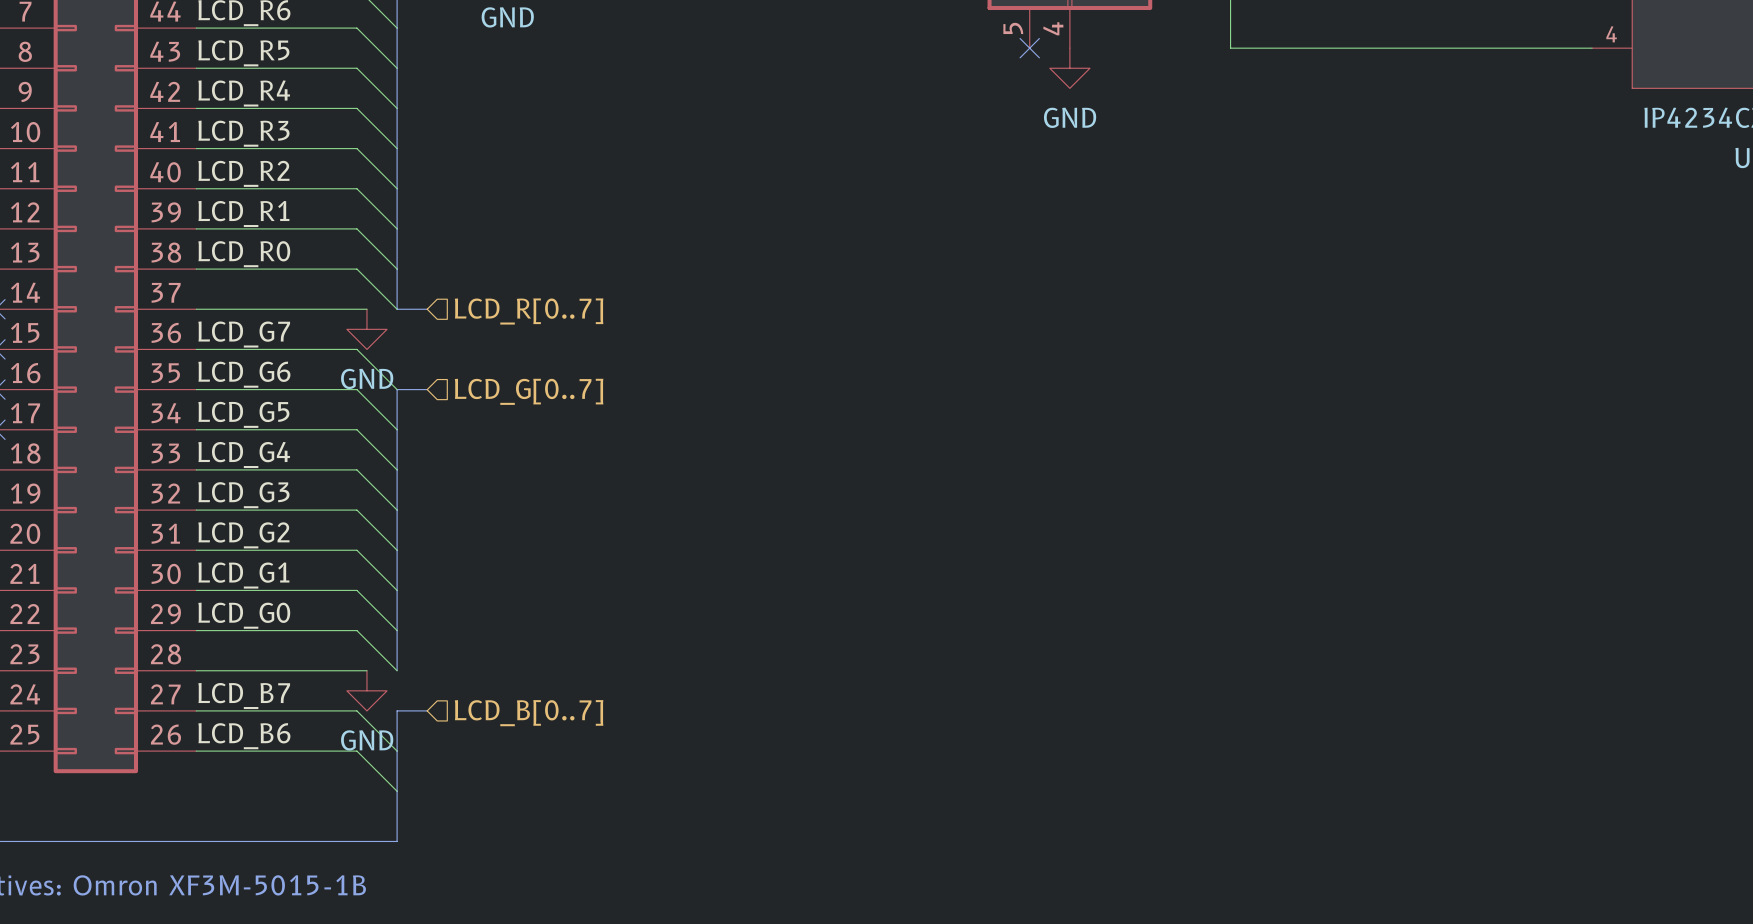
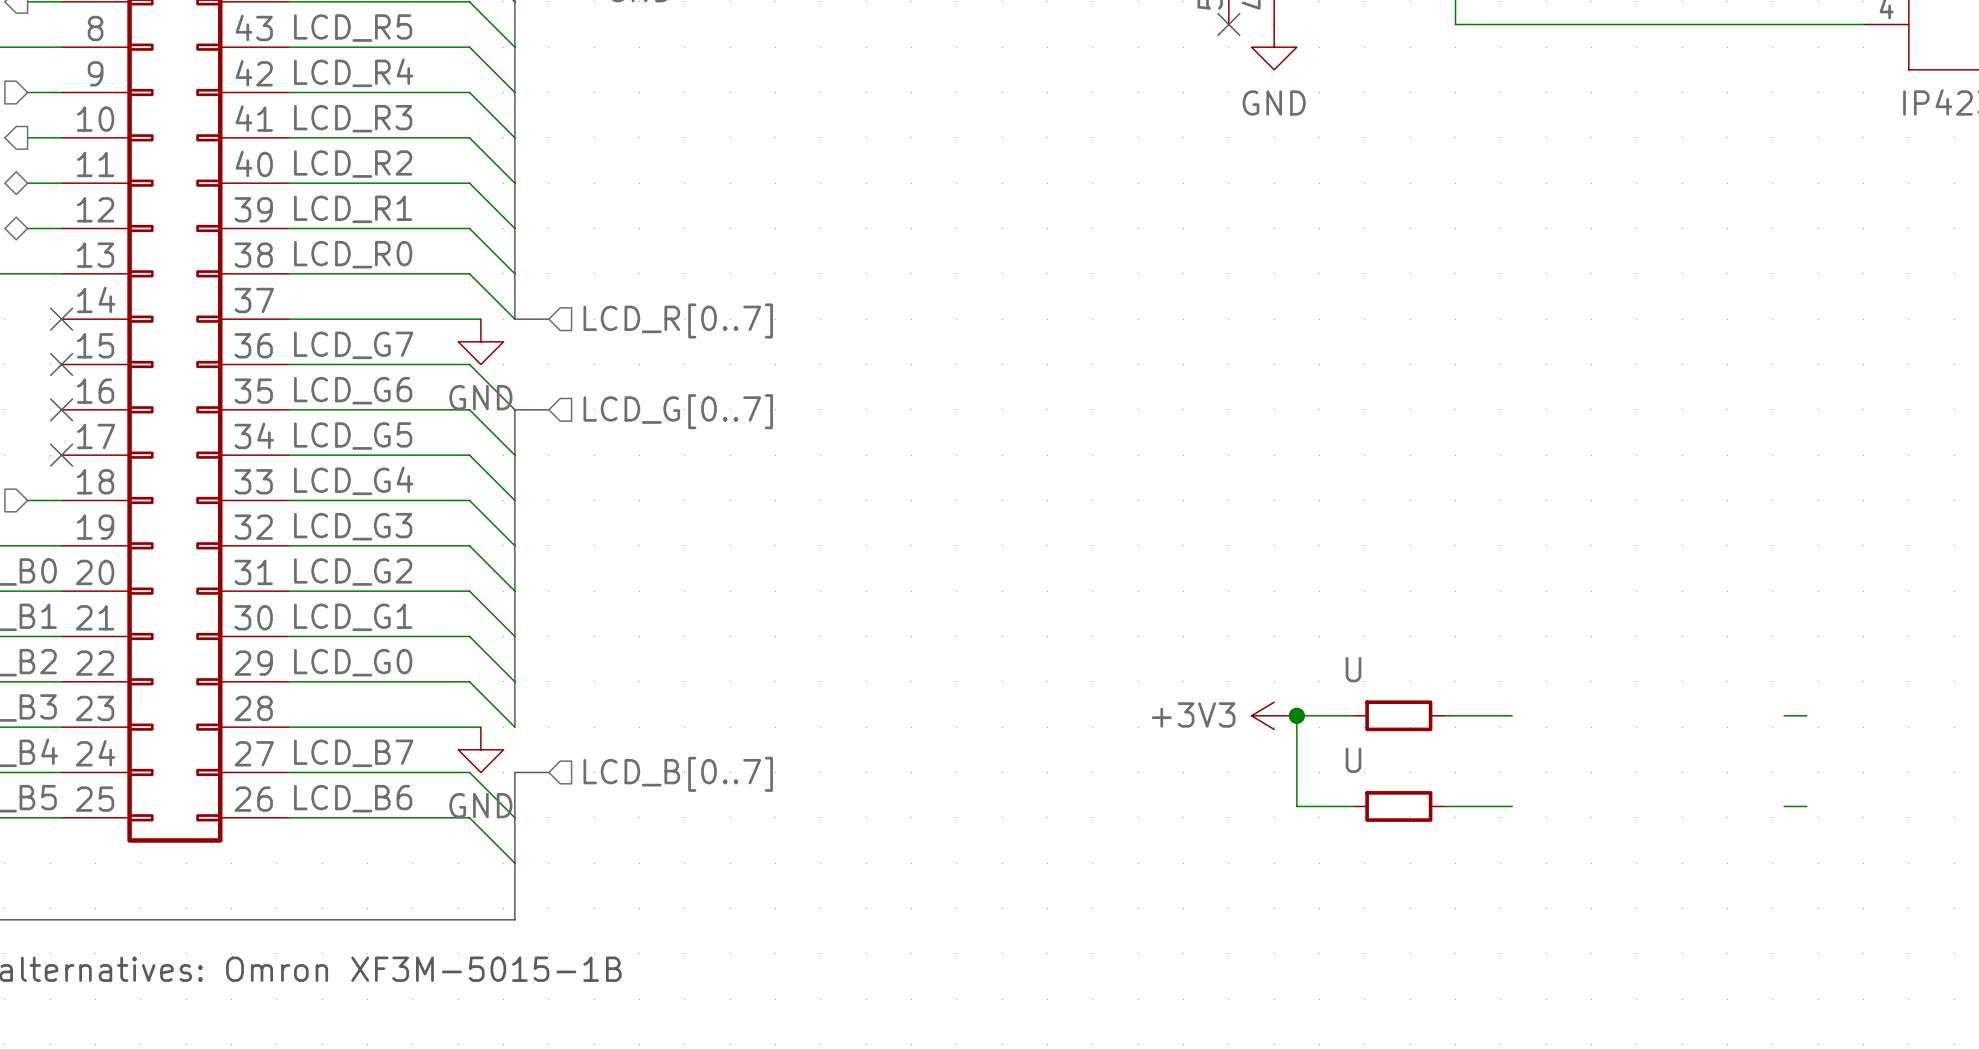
power symbol: none -> +3V3 (1274, 715)
junction: none -> (1296, 715)
wire: none -> (1353, 715) (1296, 715) (1296, 806) (1353, 806)
U: none -> (1398, 715)
wire: none -> (1444, 715) (1512, 715)
wire: none -> (1784, 715) (1806, 715)
U: none -> (1398, 806)
wire: none -> (1444, 806) (1512, 806)
wire: none -> (1784, 806) (1806, 806)

